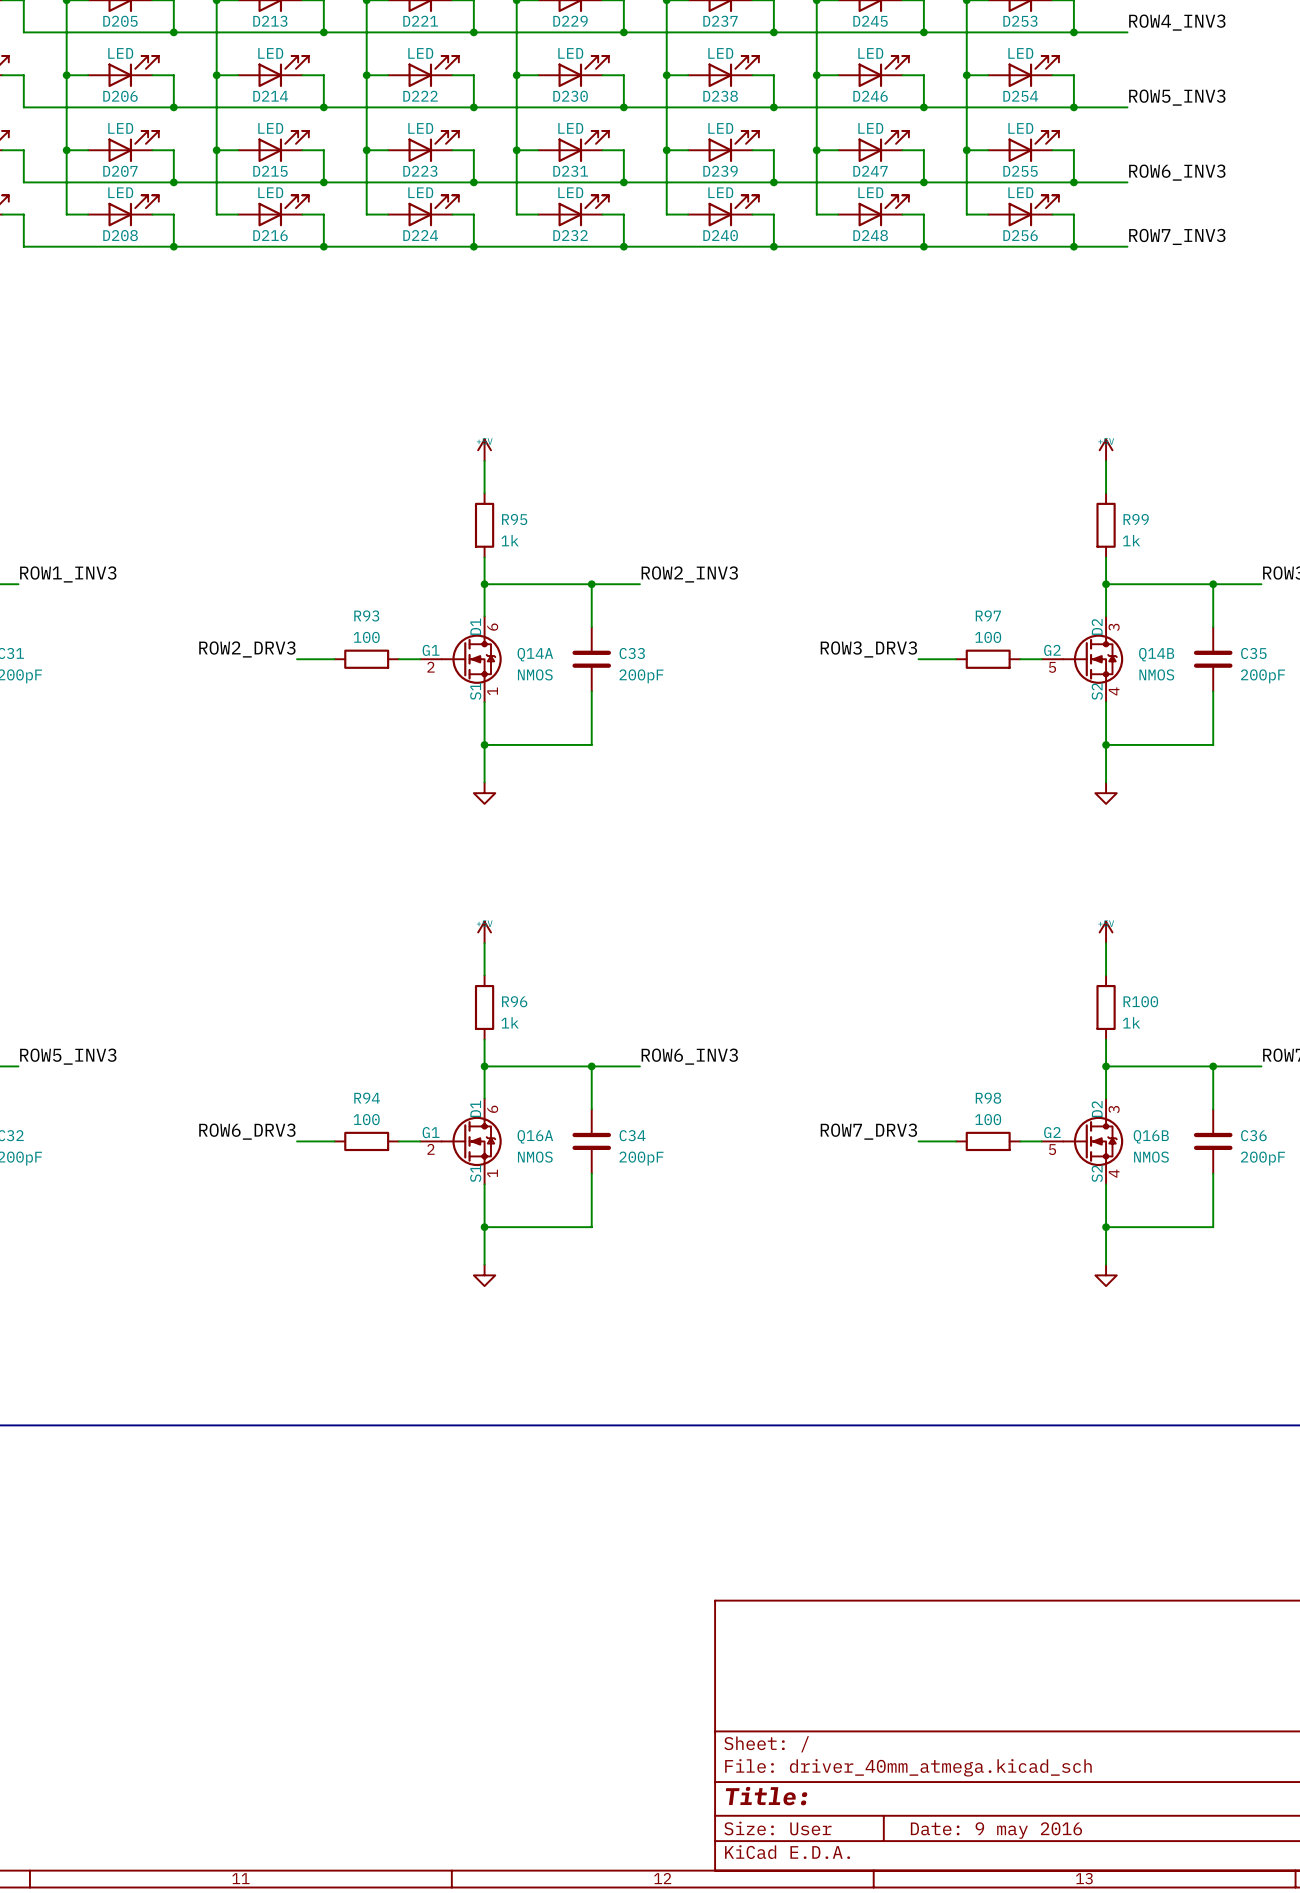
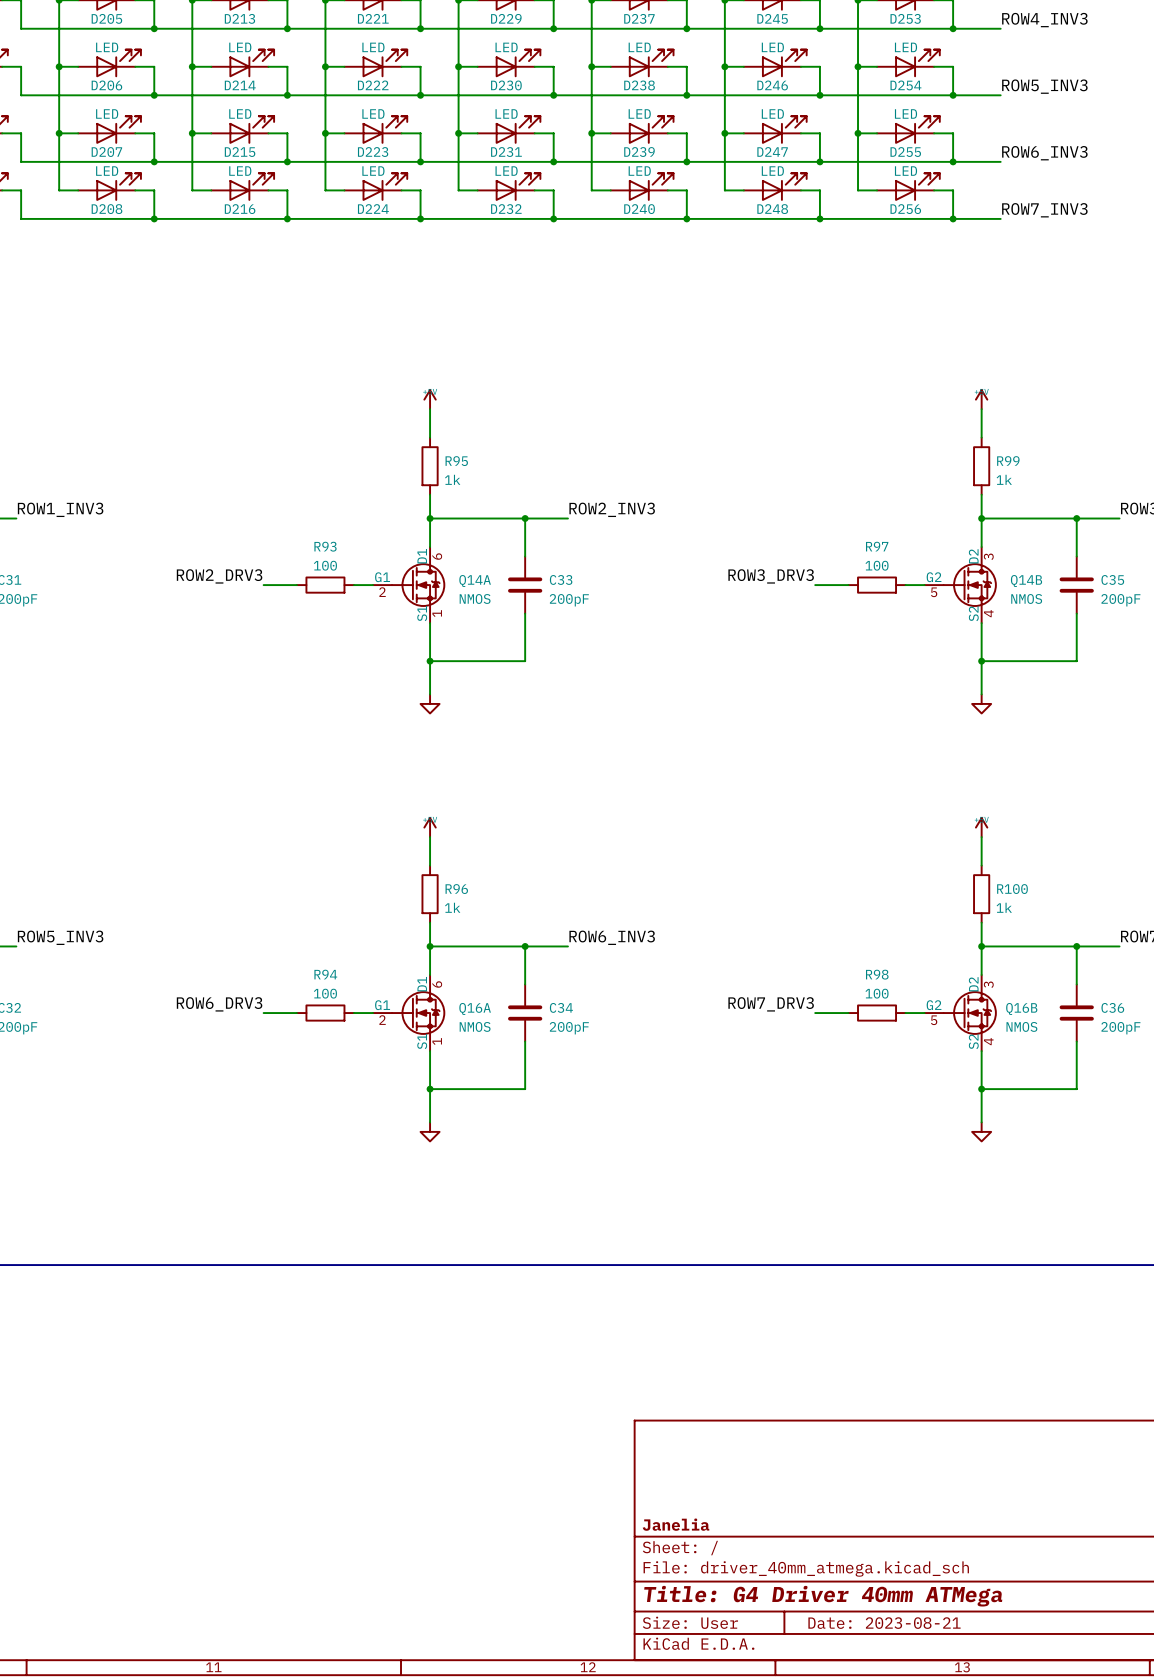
title block: none -> Janelia (676, 1524)
title block: Title: (766, 1796) -> Title: G4 Driver 40mm ATMega (823, 1596)
title block: Date: 9 may 2016 (996, 1830) -> Date: 2023-08-21 (884, 1623)

